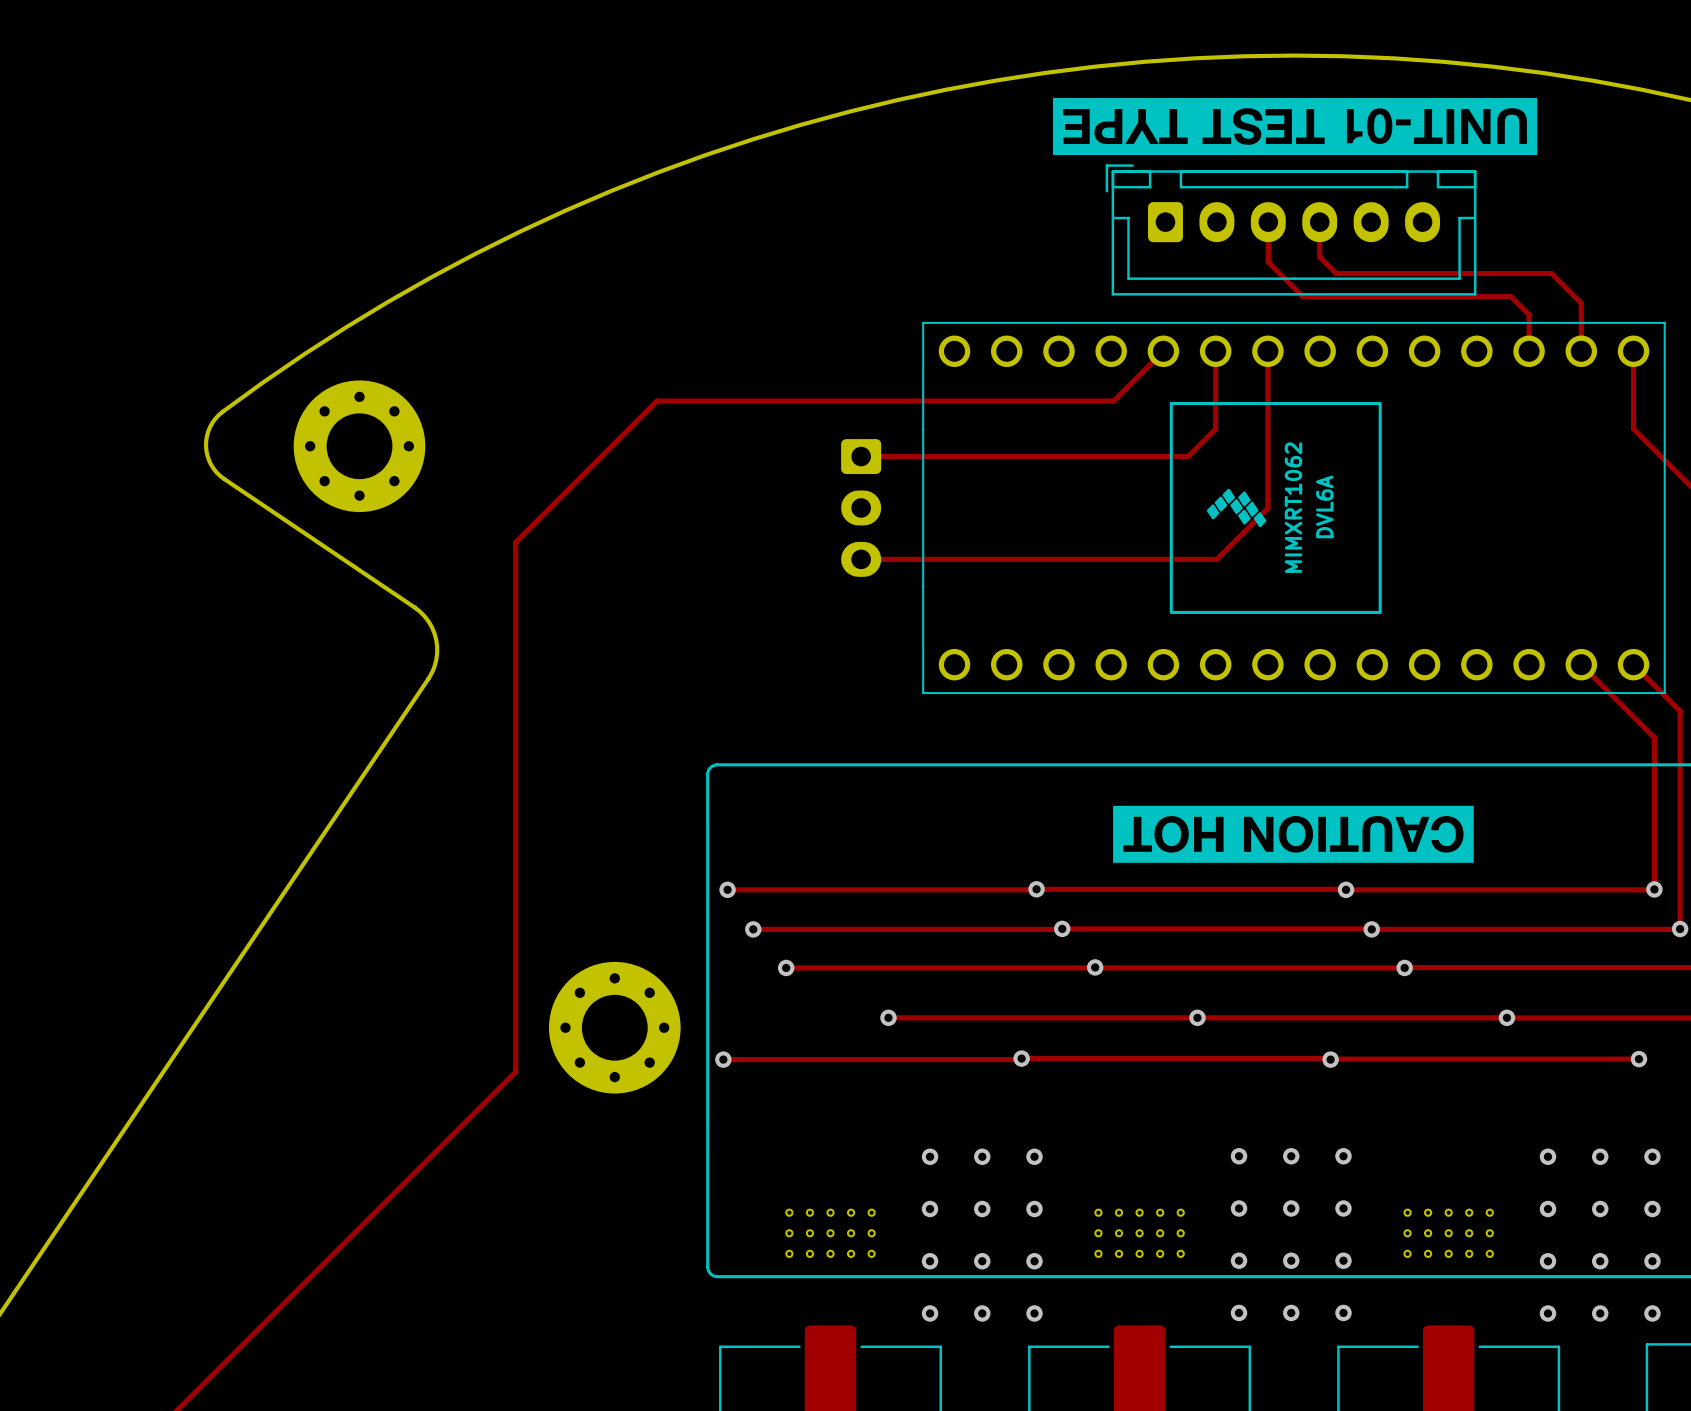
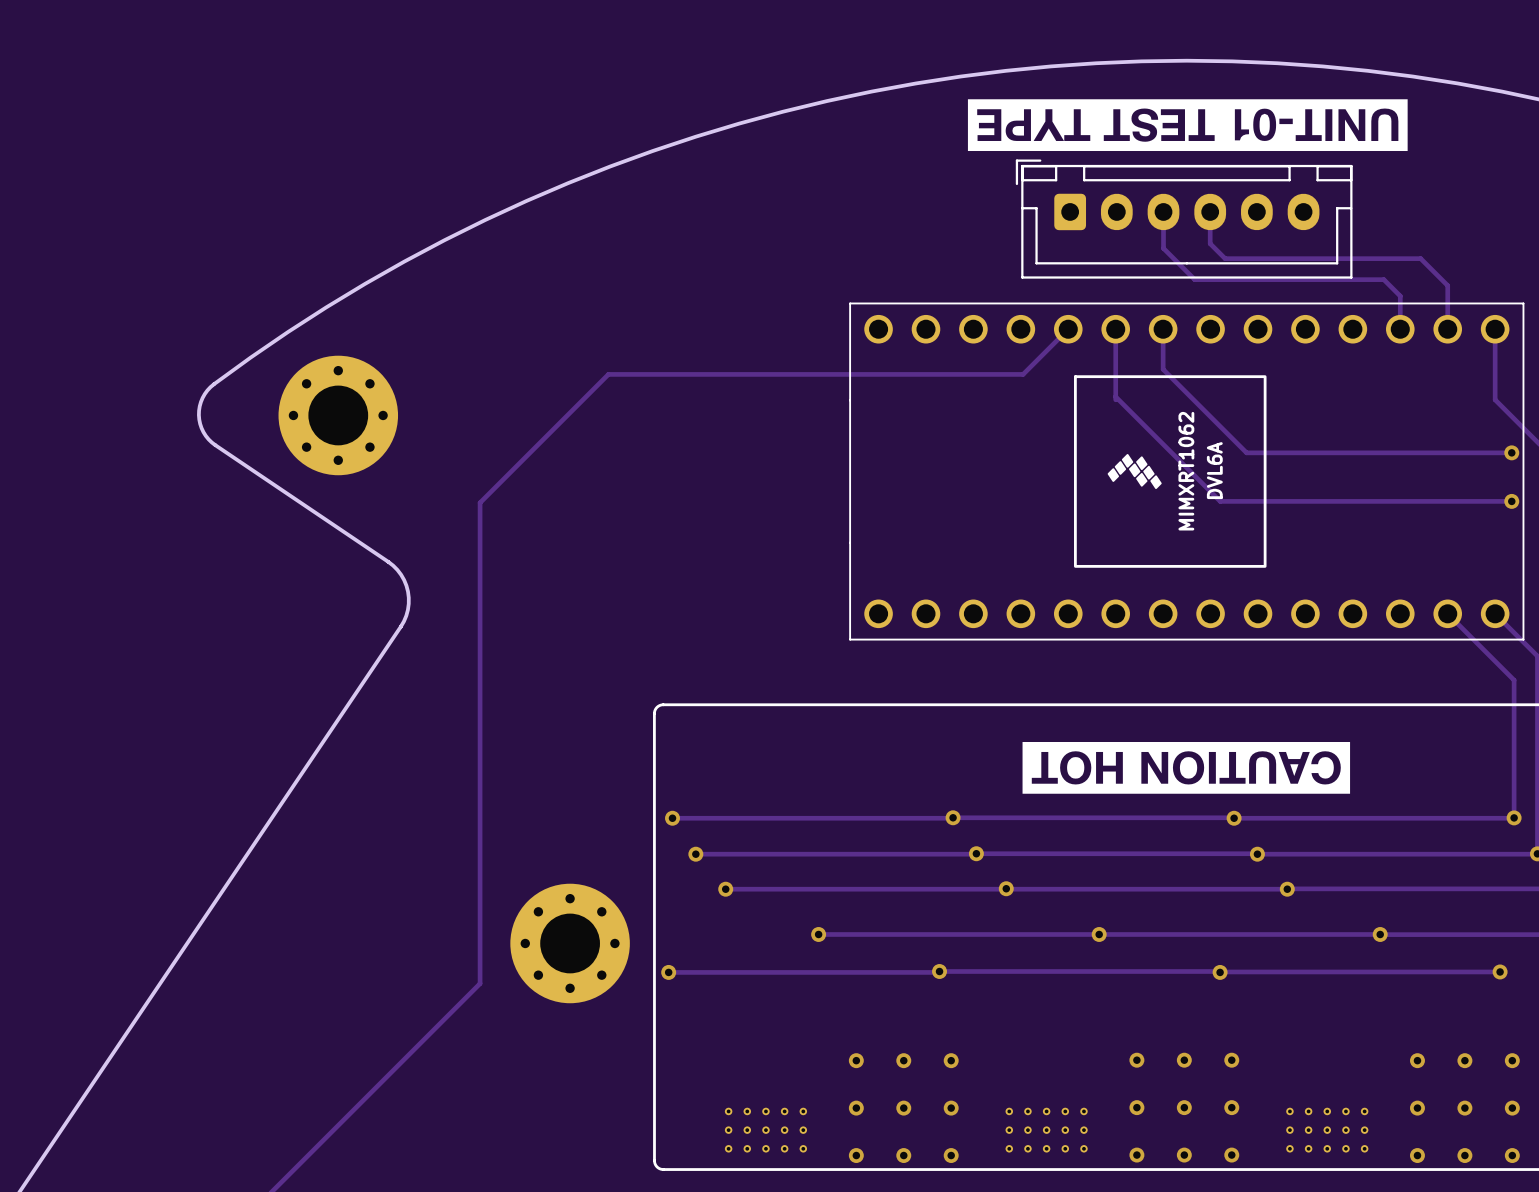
track: (1267, 395) (1267, 508) (1216, 559) (861, 559) -> (1163, 369) (1246, 452) (1511, 452)
track: none -> (1115, 396) (1220, 501) (1511, 501)
track: (1215, 429) (1188, 456) (861, 456) -> none
via: none -> (1511, 452)
part: (861, 507) -> none
via: none -> (1511, 501)

